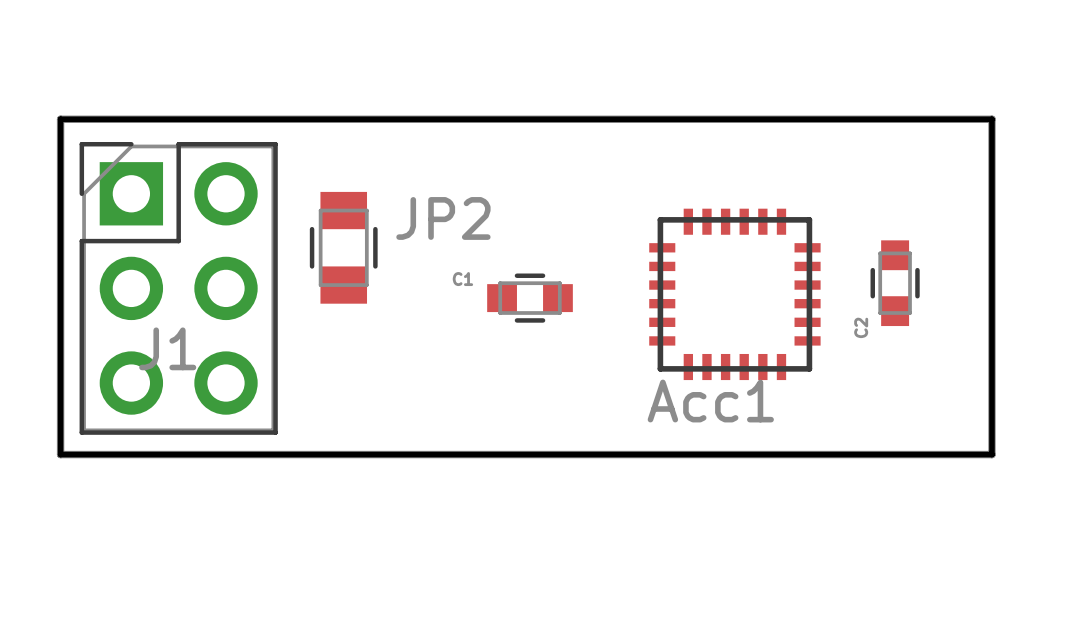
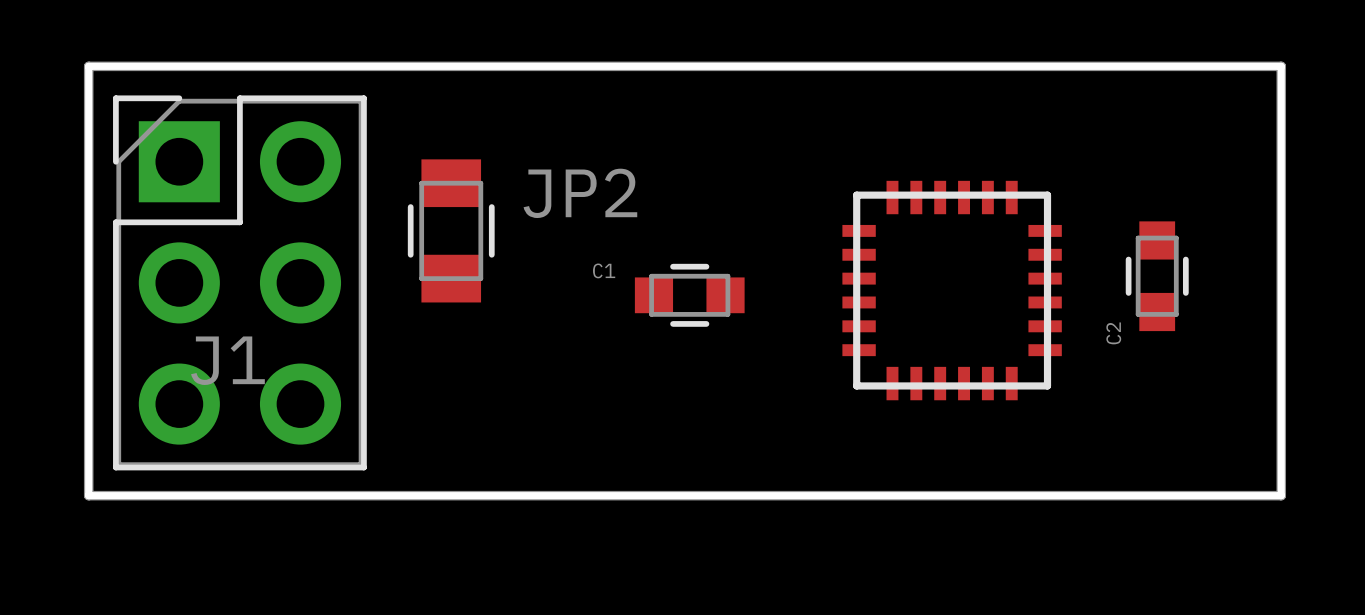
part value: Acc1 (710, 401) -> none

